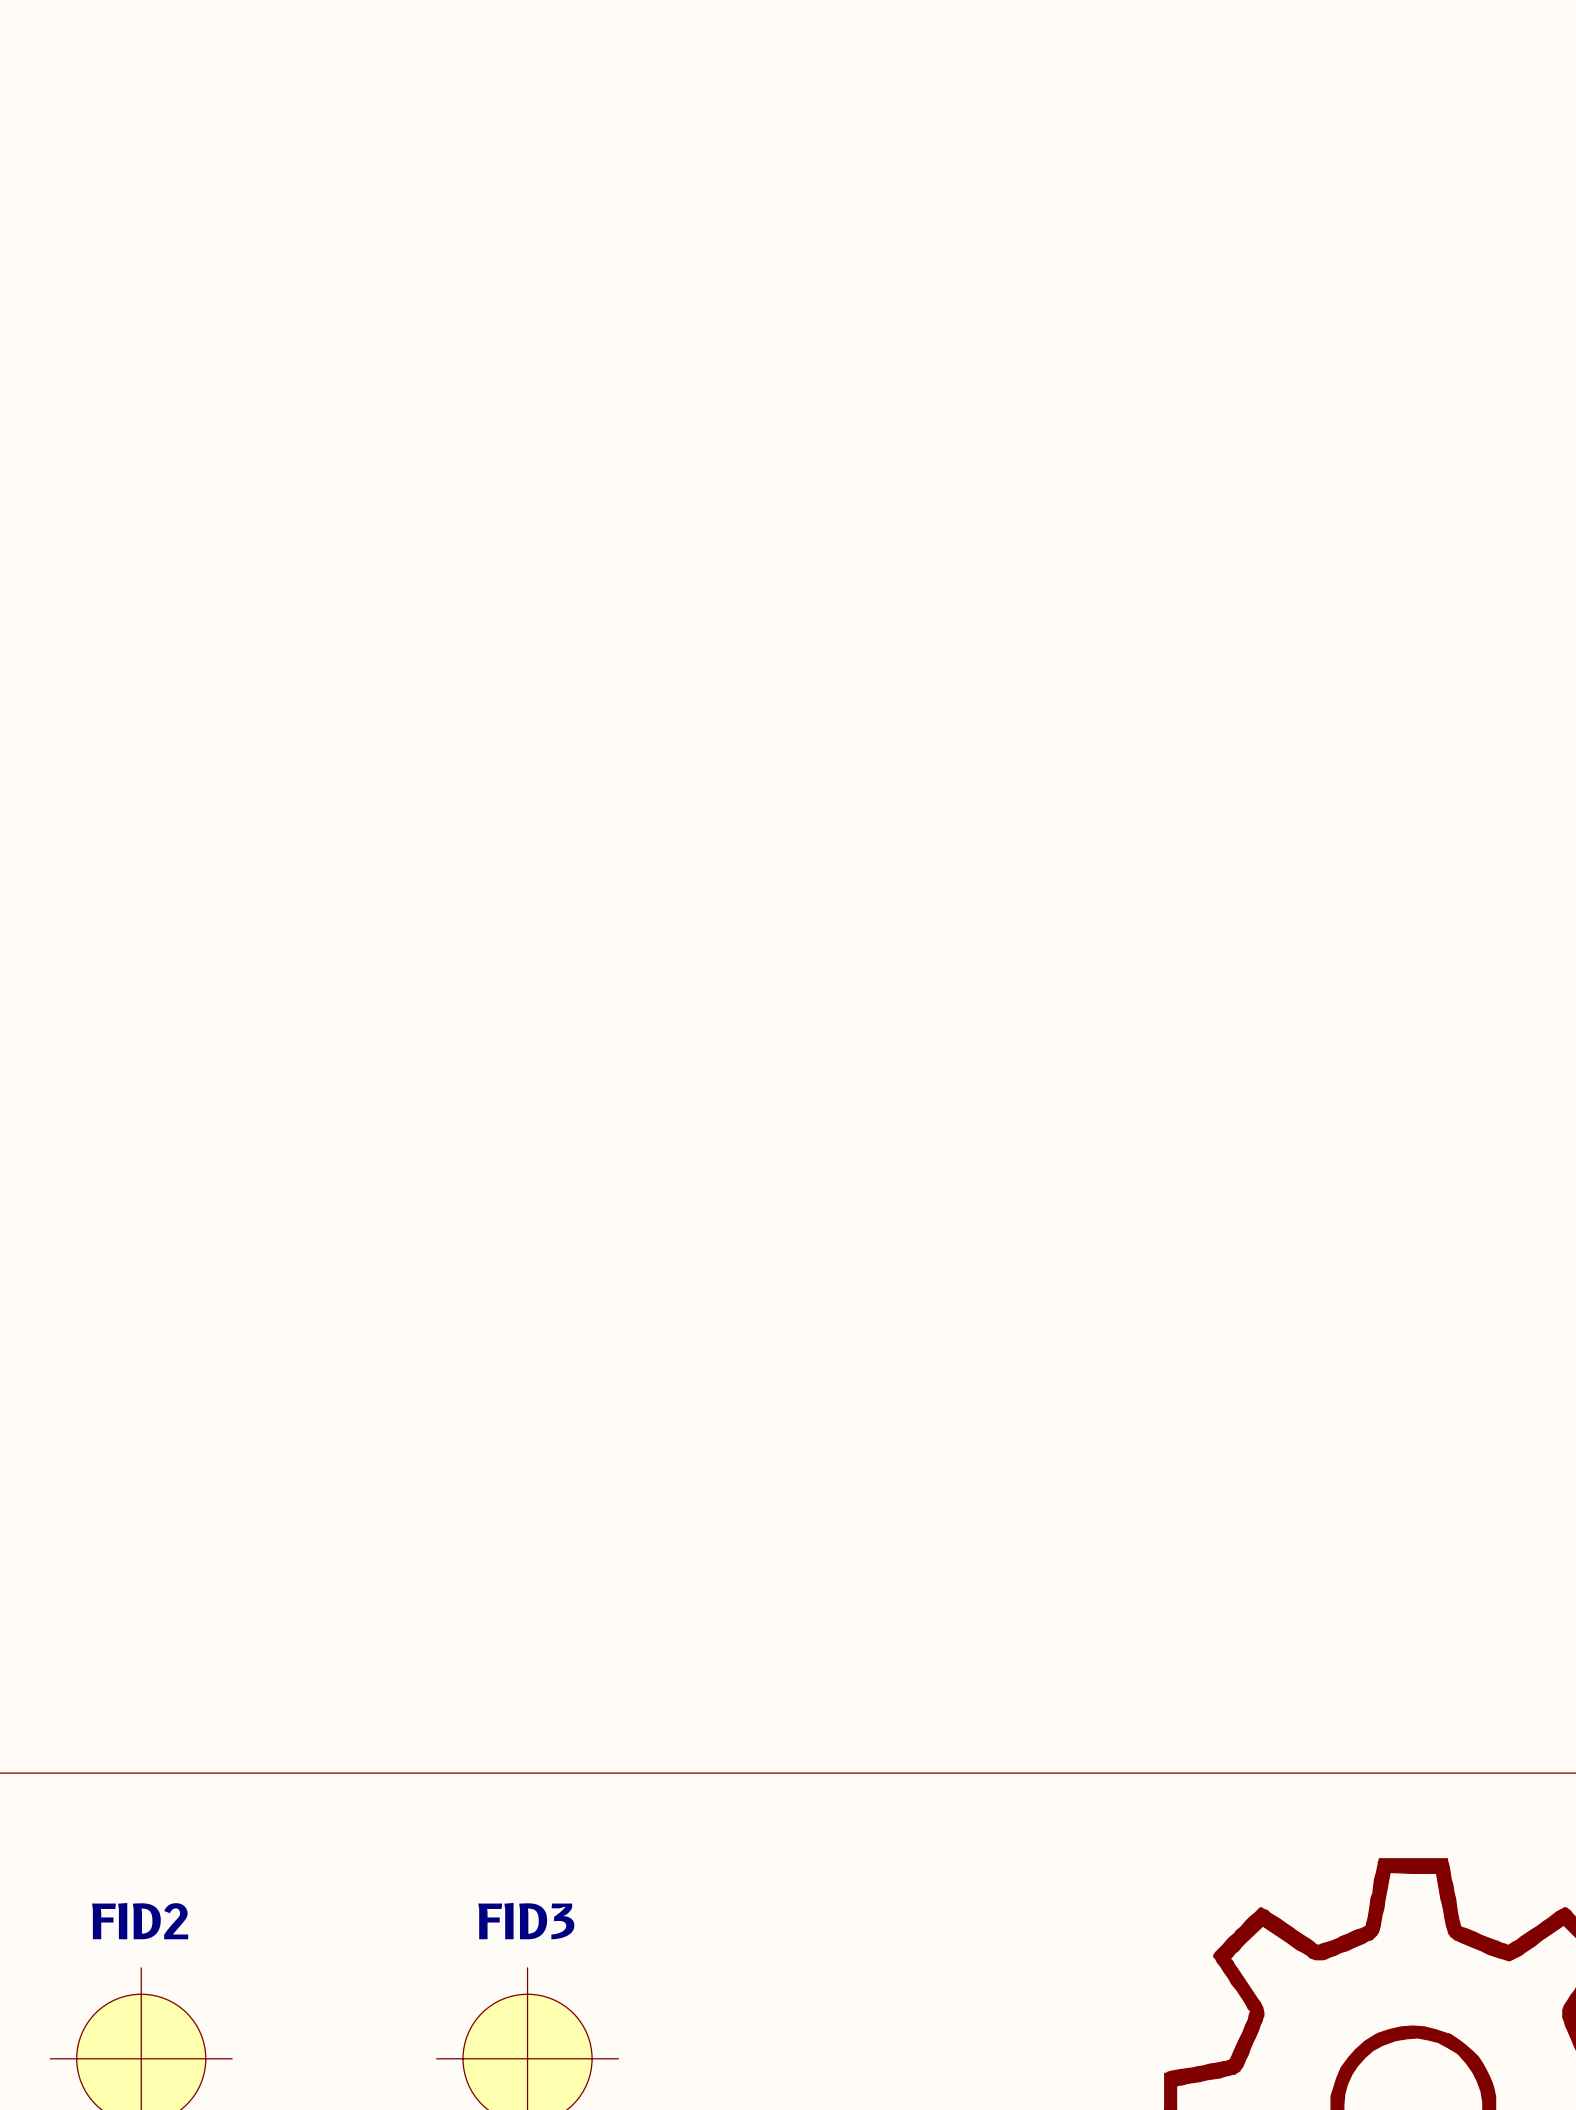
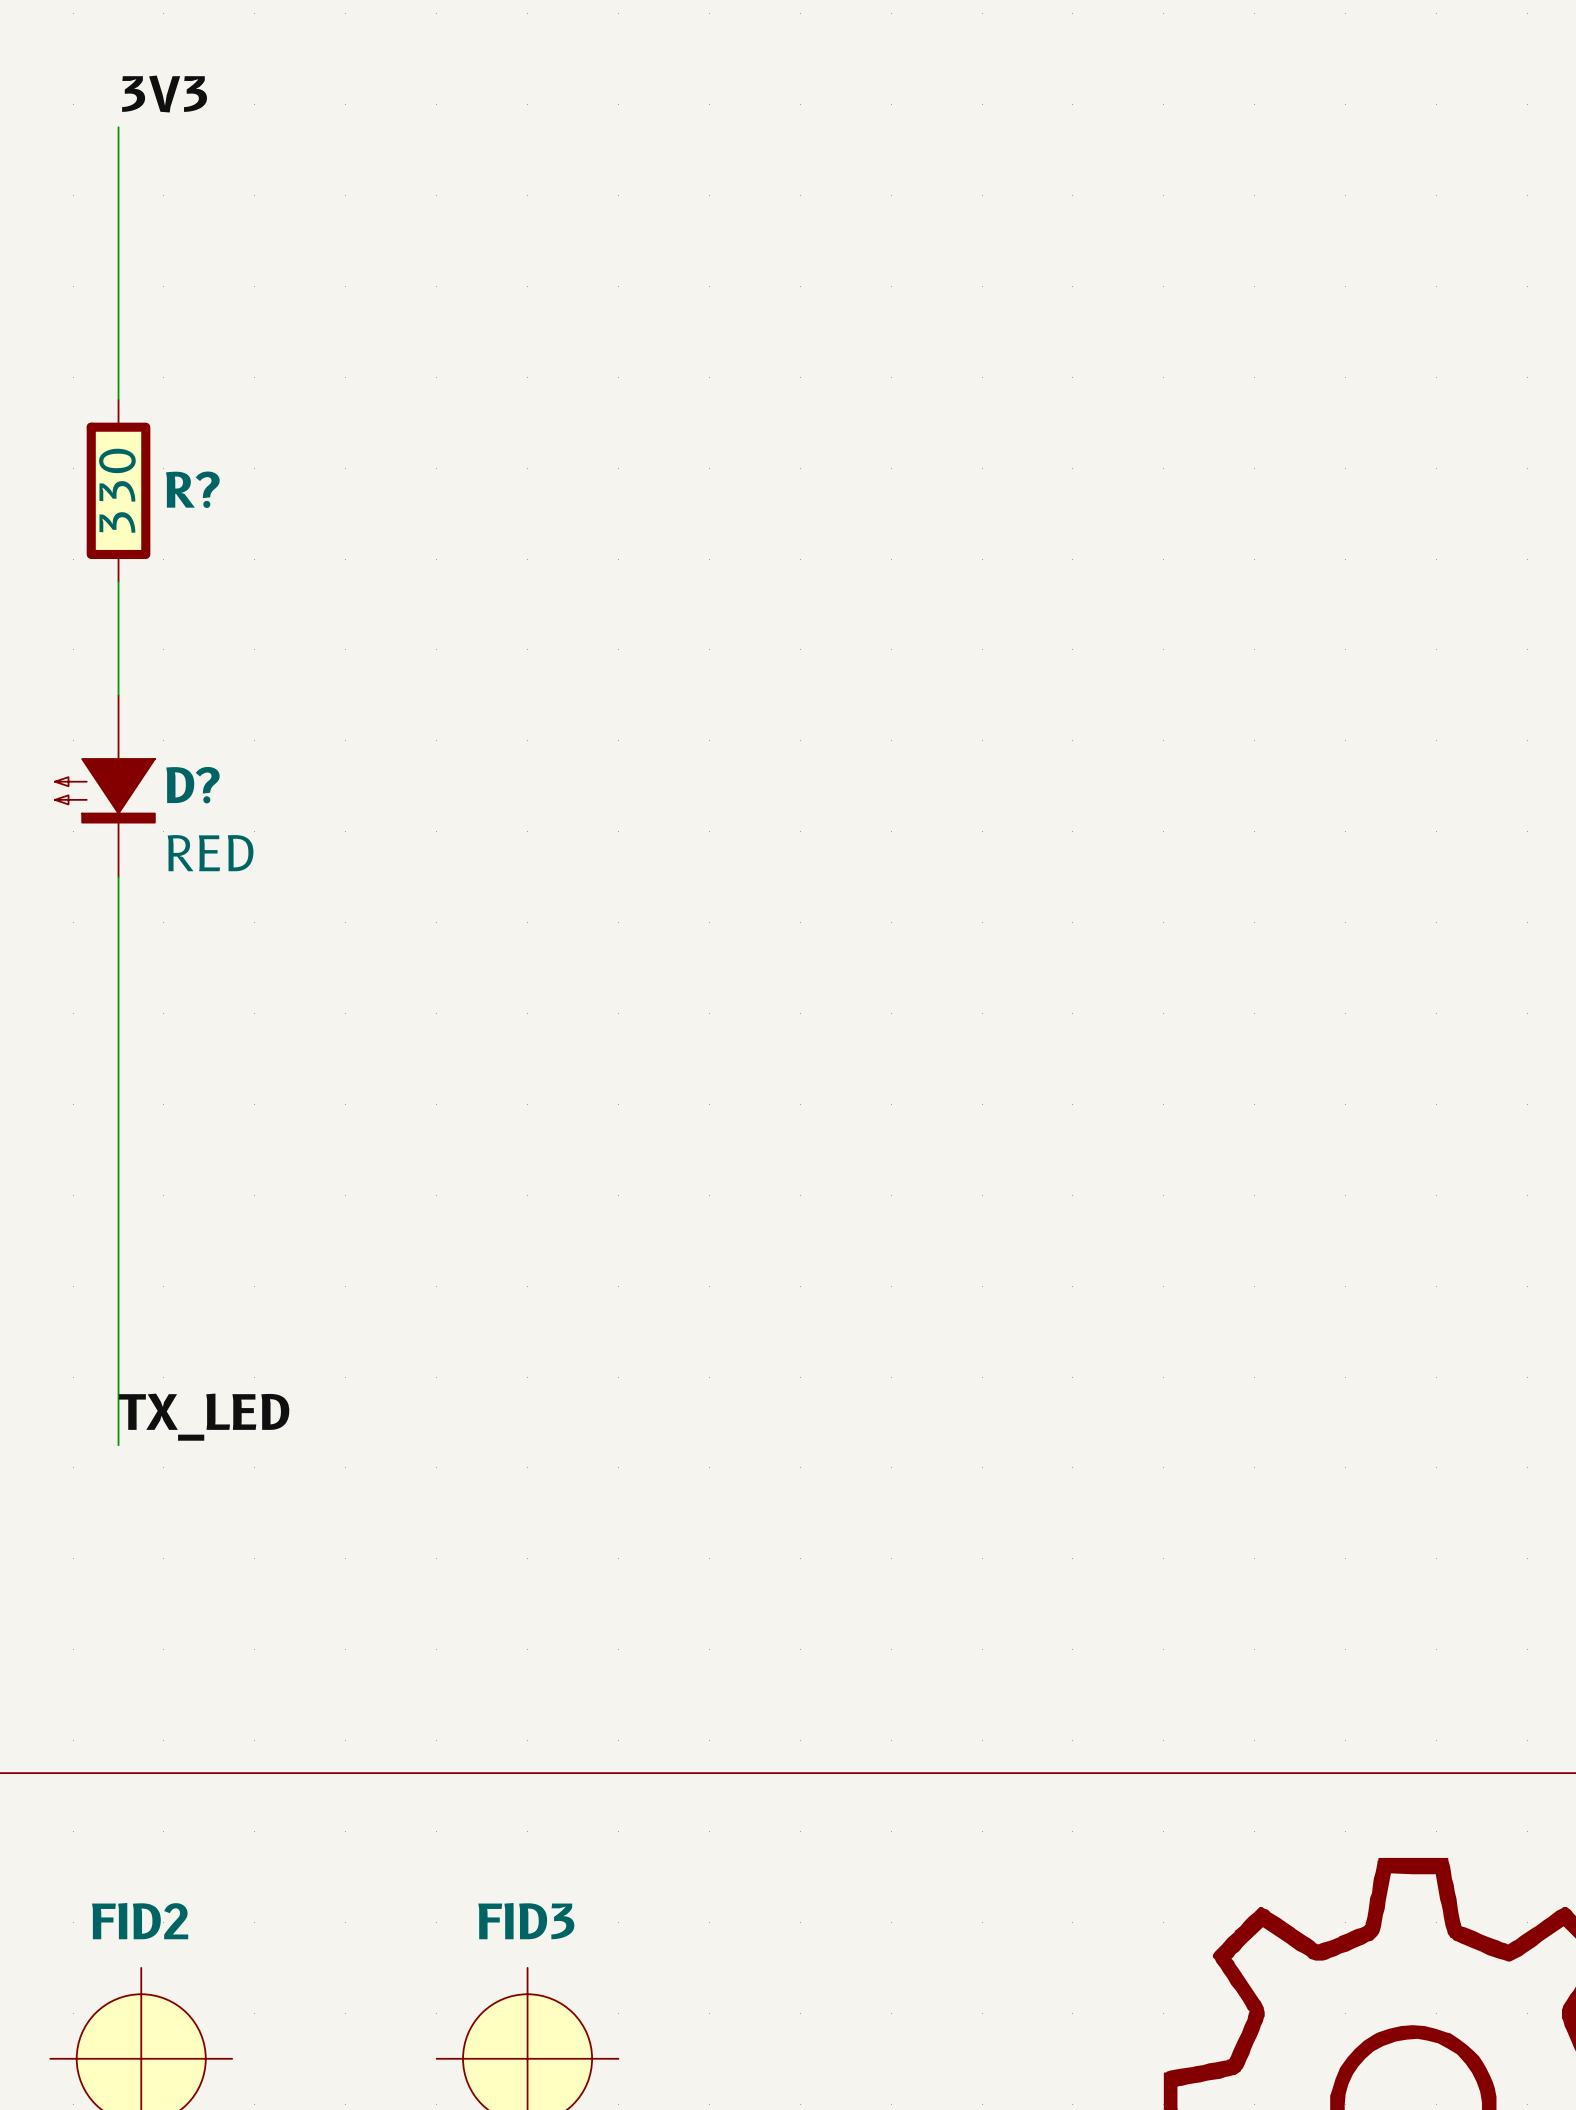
label: none -> 3V3 (164, 94)
wire: none -> (118, 127) (118, 399)
R?: none -> 330 (118, 490)
wire: none -> (118, 581) (118, 695)
D?: none -> RED (104, 786)
wire: none -> (118, 877) (118, 1445)
label: none -> TX_LED (204, 1417)

